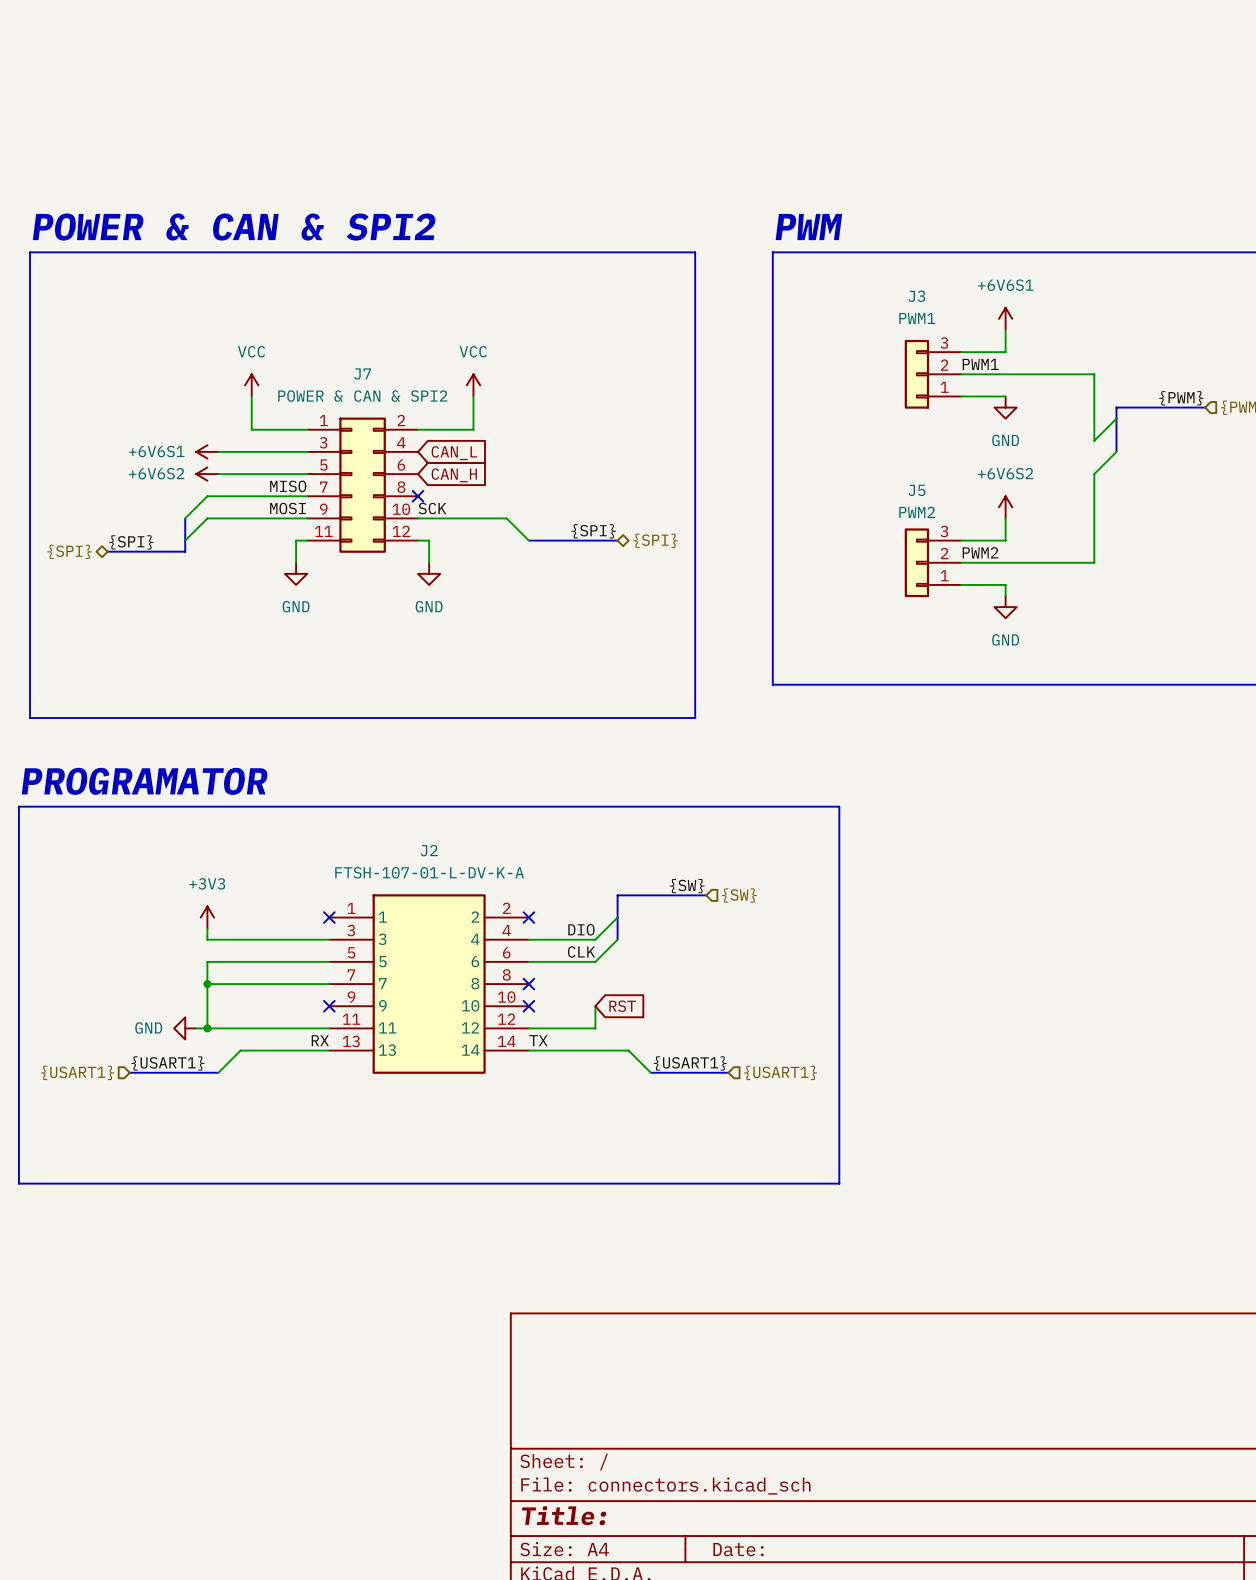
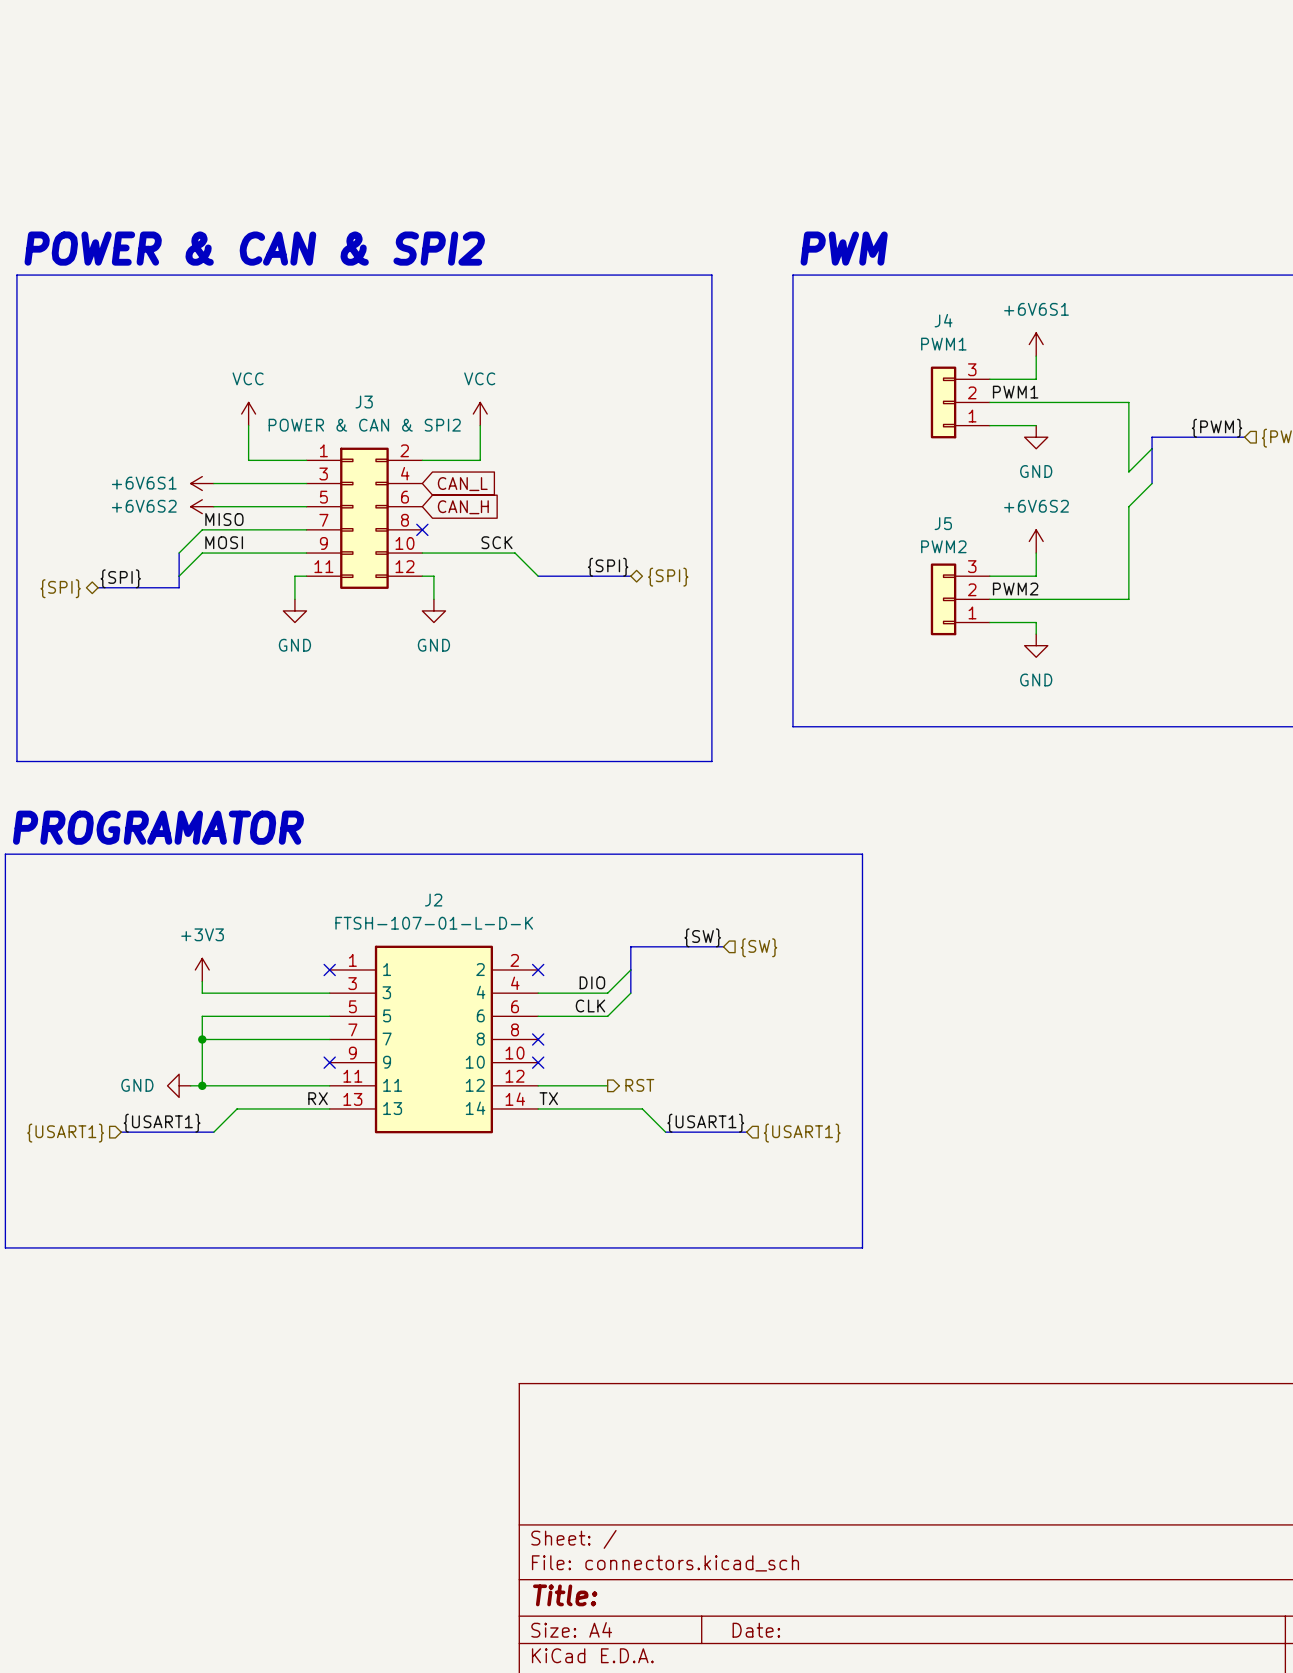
J3 name: J3 (916, 296) -> J4 (943, 320)
J7 name: J7 (362, 373) -> J3 (364, 402)
label position: MISO (288, 486) -> MISO (224, 519)
label position: MOSI (287, 508) -> MOSI (224, 542)
label position: SCK (432, 508) -> SCK (497, 542)
J2 value: FTSH-107-01-L-DV-K-A (429, 872) -> FTSH-107-01-L-D-K (434, 923)
wire: (595, 1006) (595, 1028) -> none
global label: RST (622, 1006) -> none
hierarchical label: none -> RST (639, 1085)

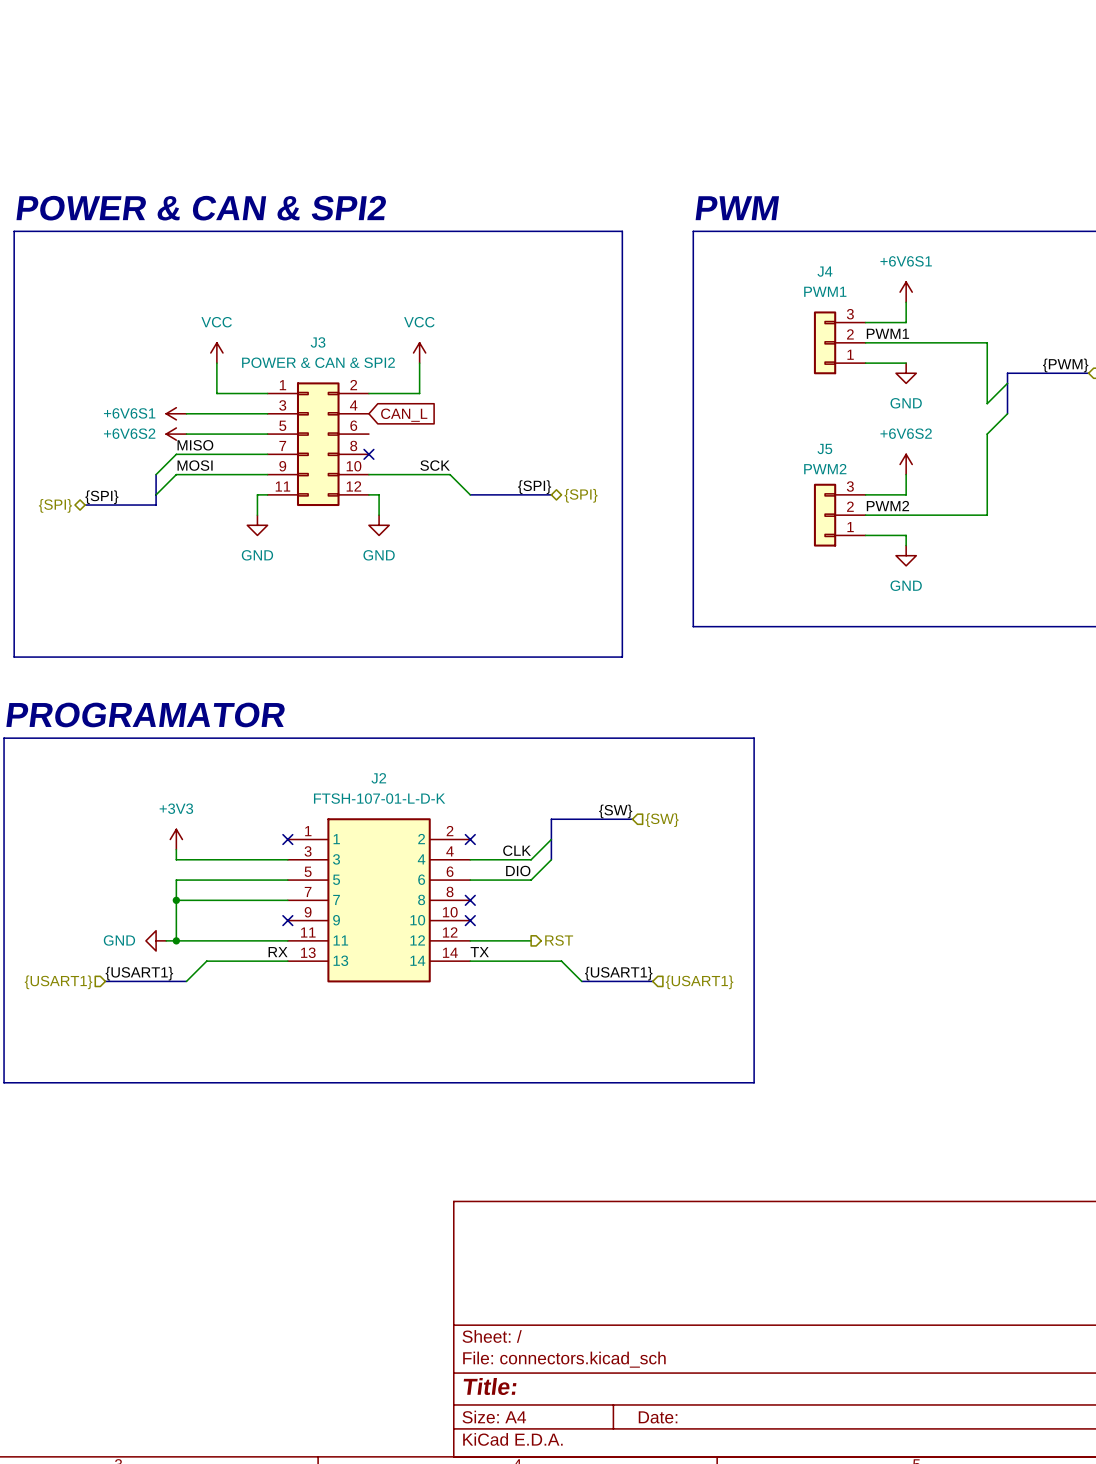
global label: CAN_H (463, 507) -> none
label: DIO (592, 982) -> CLK (517, 850)
label: CLK (590, 1005) -> DIO (518, 871)

